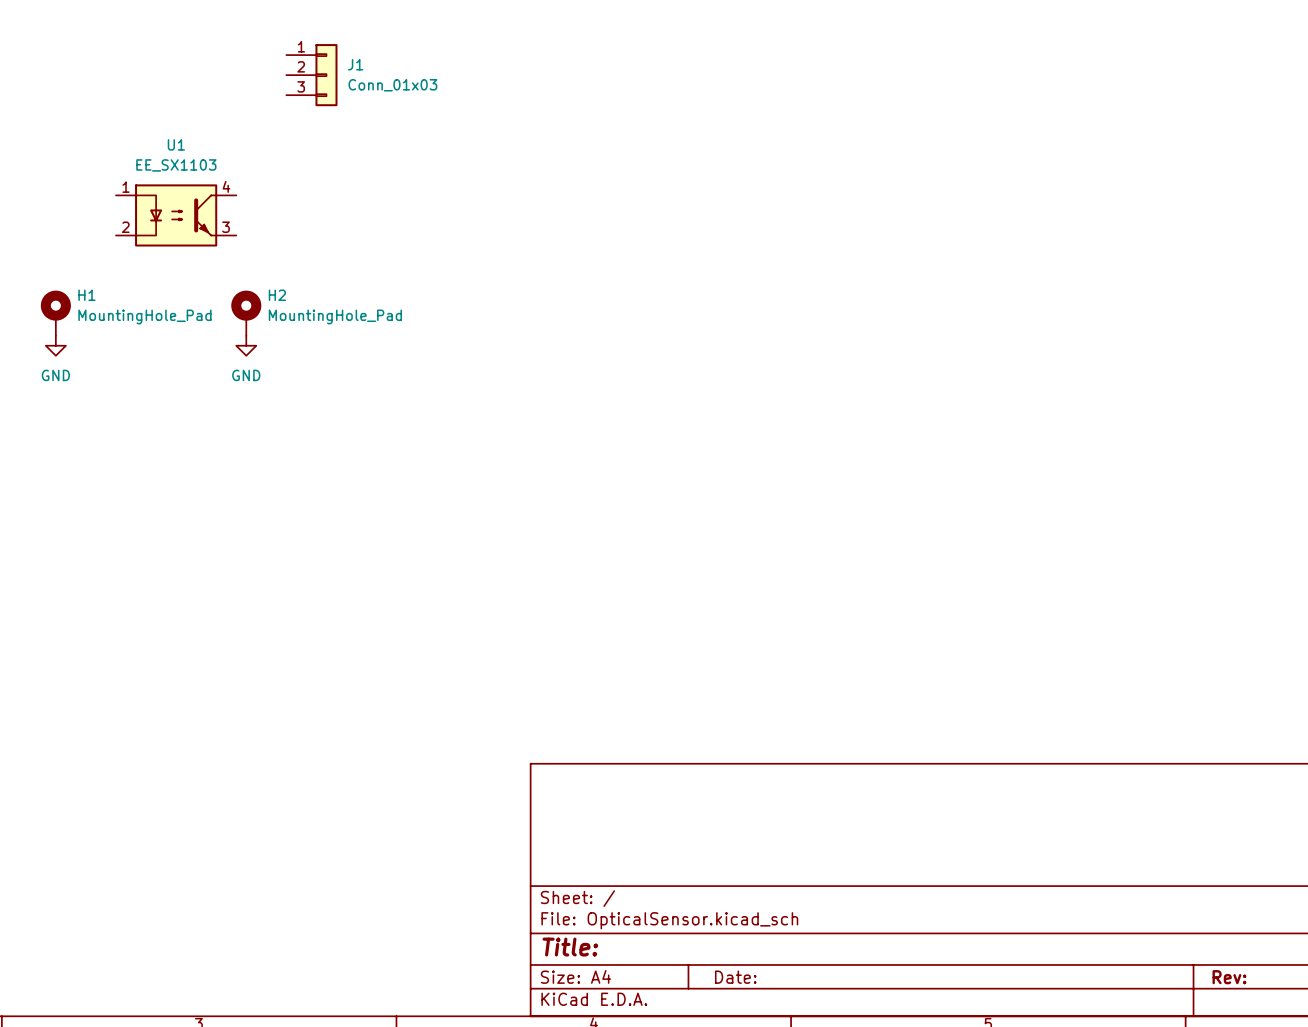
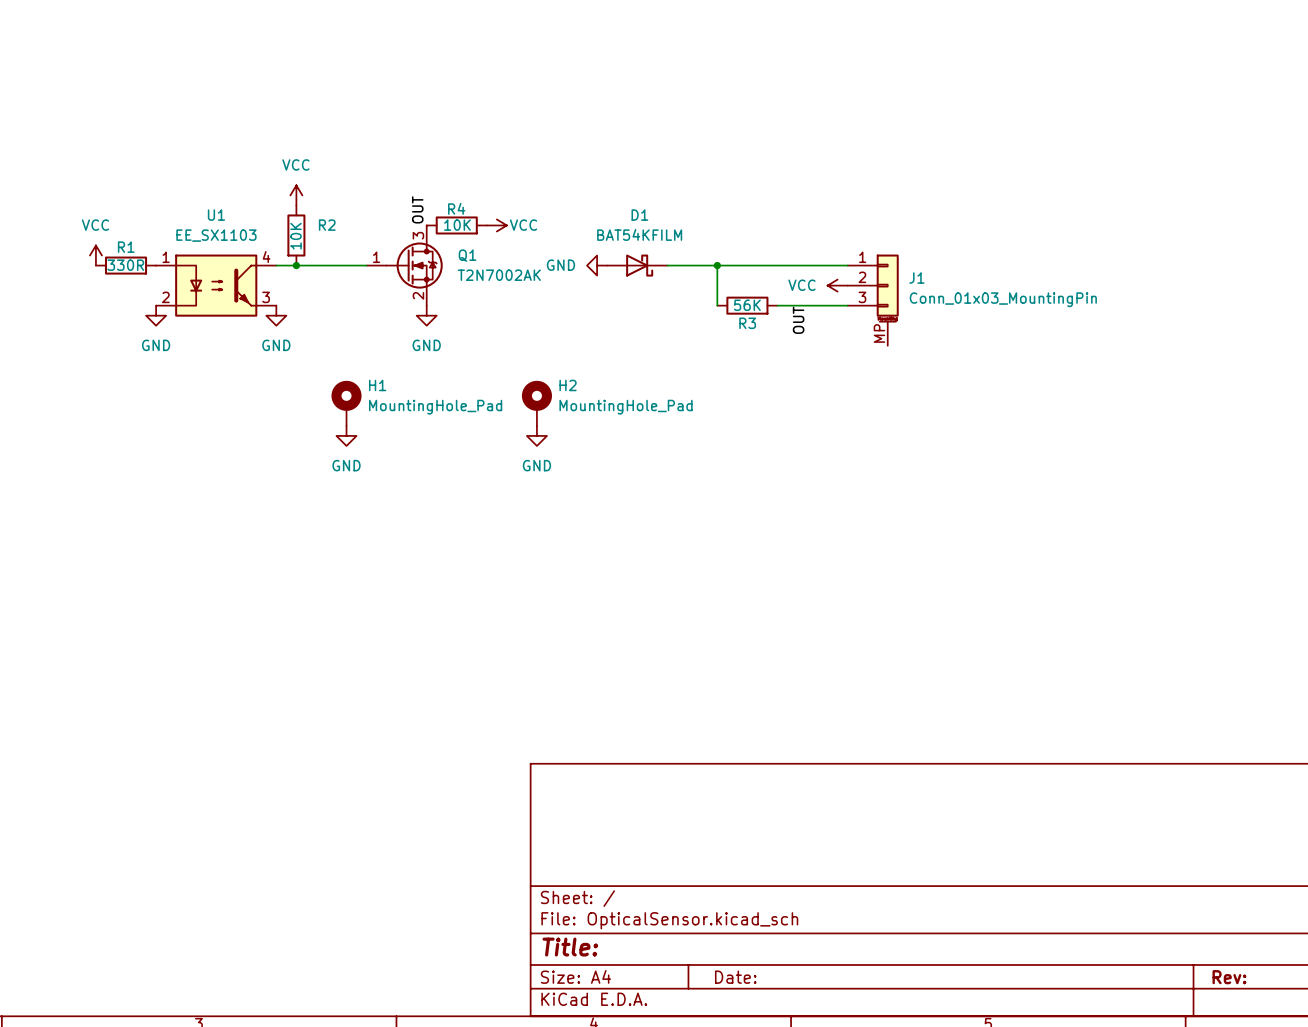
J1 symbol: [286, 44, 338, 107] -> [847, 254, 899, 346]
J1 value: Conn_01x03 (392, 85) -> Conn_01x03_MountingPin (1003, 299)
power symbol: none -> VCC (296, 195)
label: none -> OUT (417, 209)
U1 position: (176, 215) -> (216, 285)
R4: none -> 10K (456, 225)
power symbol: none -> VCC (496, 225)
R2: none -> 10K (296, 235)
power symbol: none -> VCC (95, 255)
R1: none -> 330R (126, 265)
wire: none -> (276, 265) (366, 265)
junction: none -> (296, 265)
Q1: none -> T2N7002AK (404, 265)
power symbol: none -> GND (597, 265)
D1: none -> BAT54KFILM (637, 265)
wire: none -> (667, 265) (847, 265)
wire: none -> (717, 265) (717, 305)
junction: none -> (717, 265)
power symbol: none -> VCC (837, 285)
R3: none -> 56K (747, 305)
wire: none -> (777, 305) (847, 305)
H1 position: (55, 313) -> (346, 403)
H2 position: (246, 313) -> (536, 403)
power symbol: none -> GND (156, 315)
power symbol: none -> GND (426, 315)
label: none -> OUT (798, 320)
power symbol: GND (55, 345) -> none
power symbol position: GND (246, 345) -> GND (276, 315)
power symbol: none -> GND (346, 435)
power symbol: none -> GND (536, 435)

